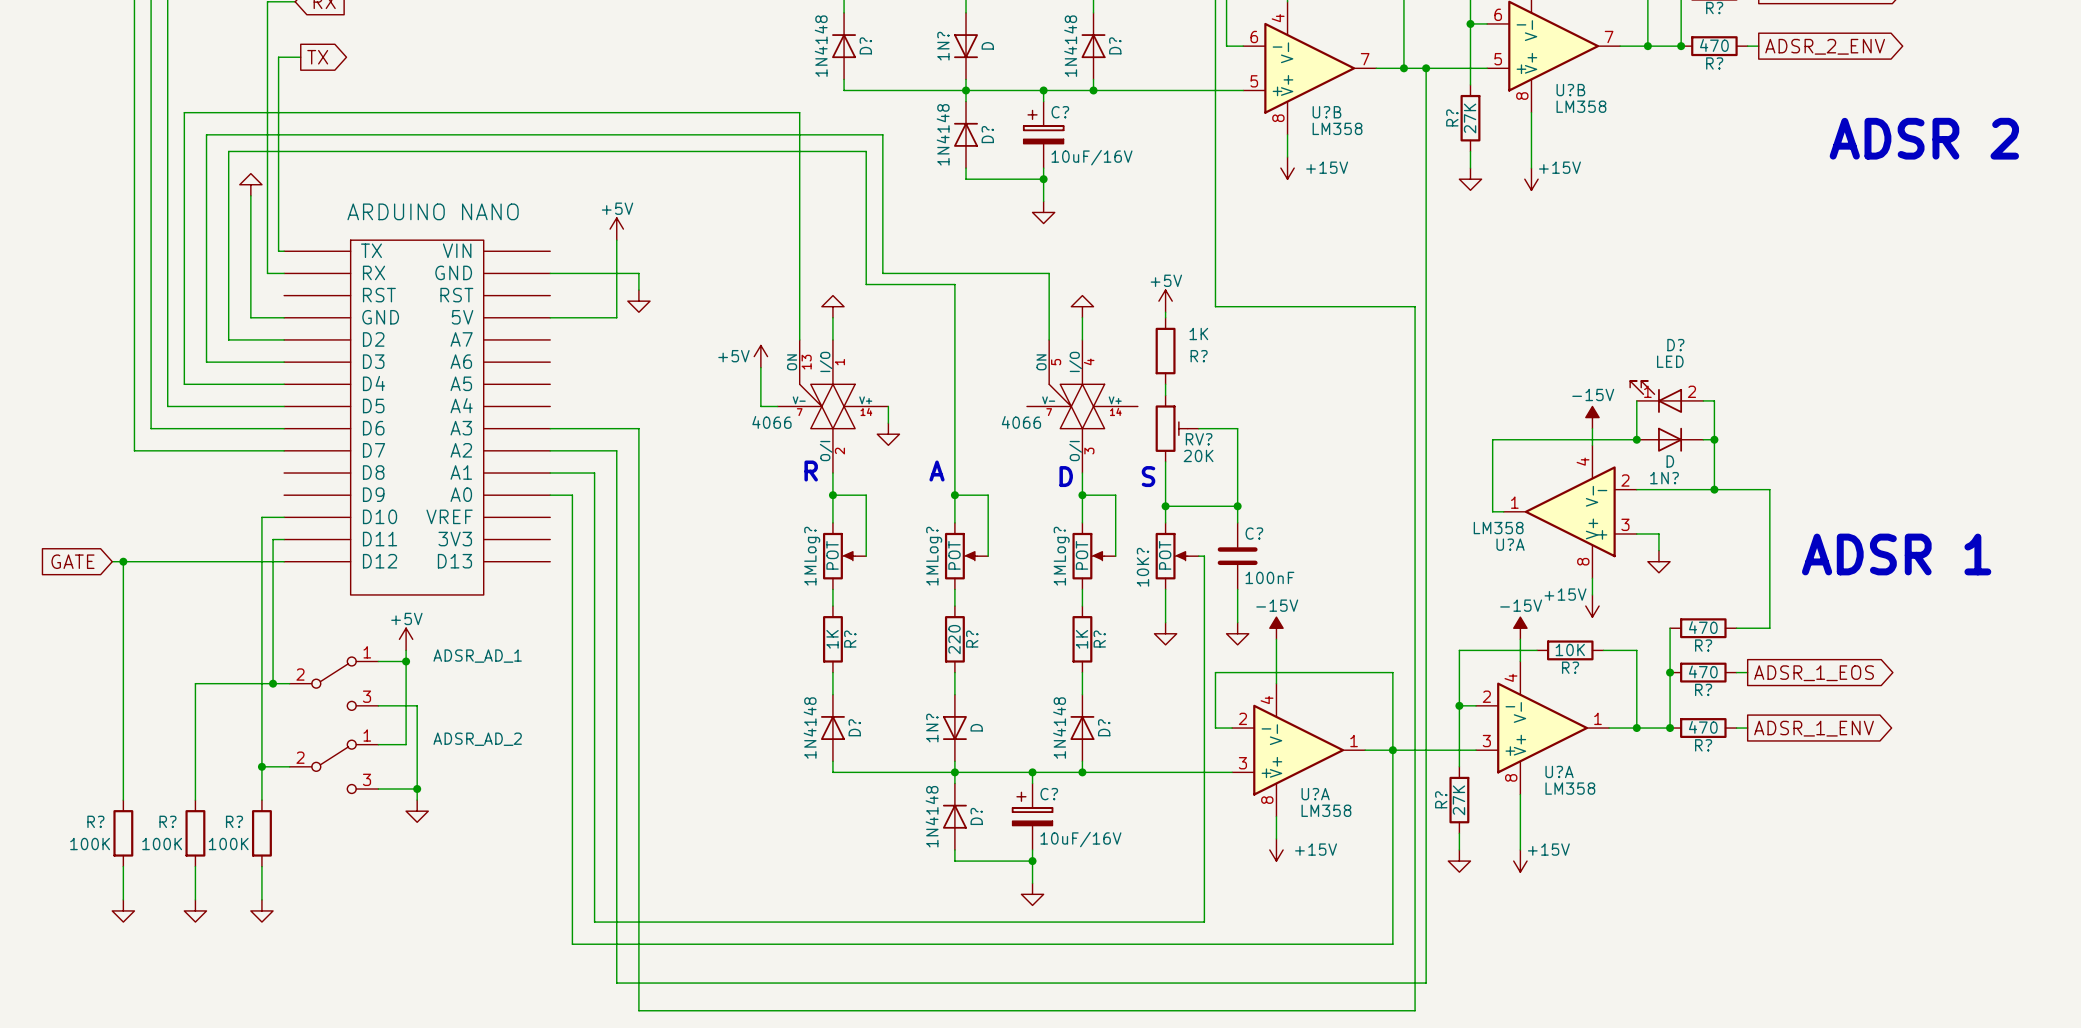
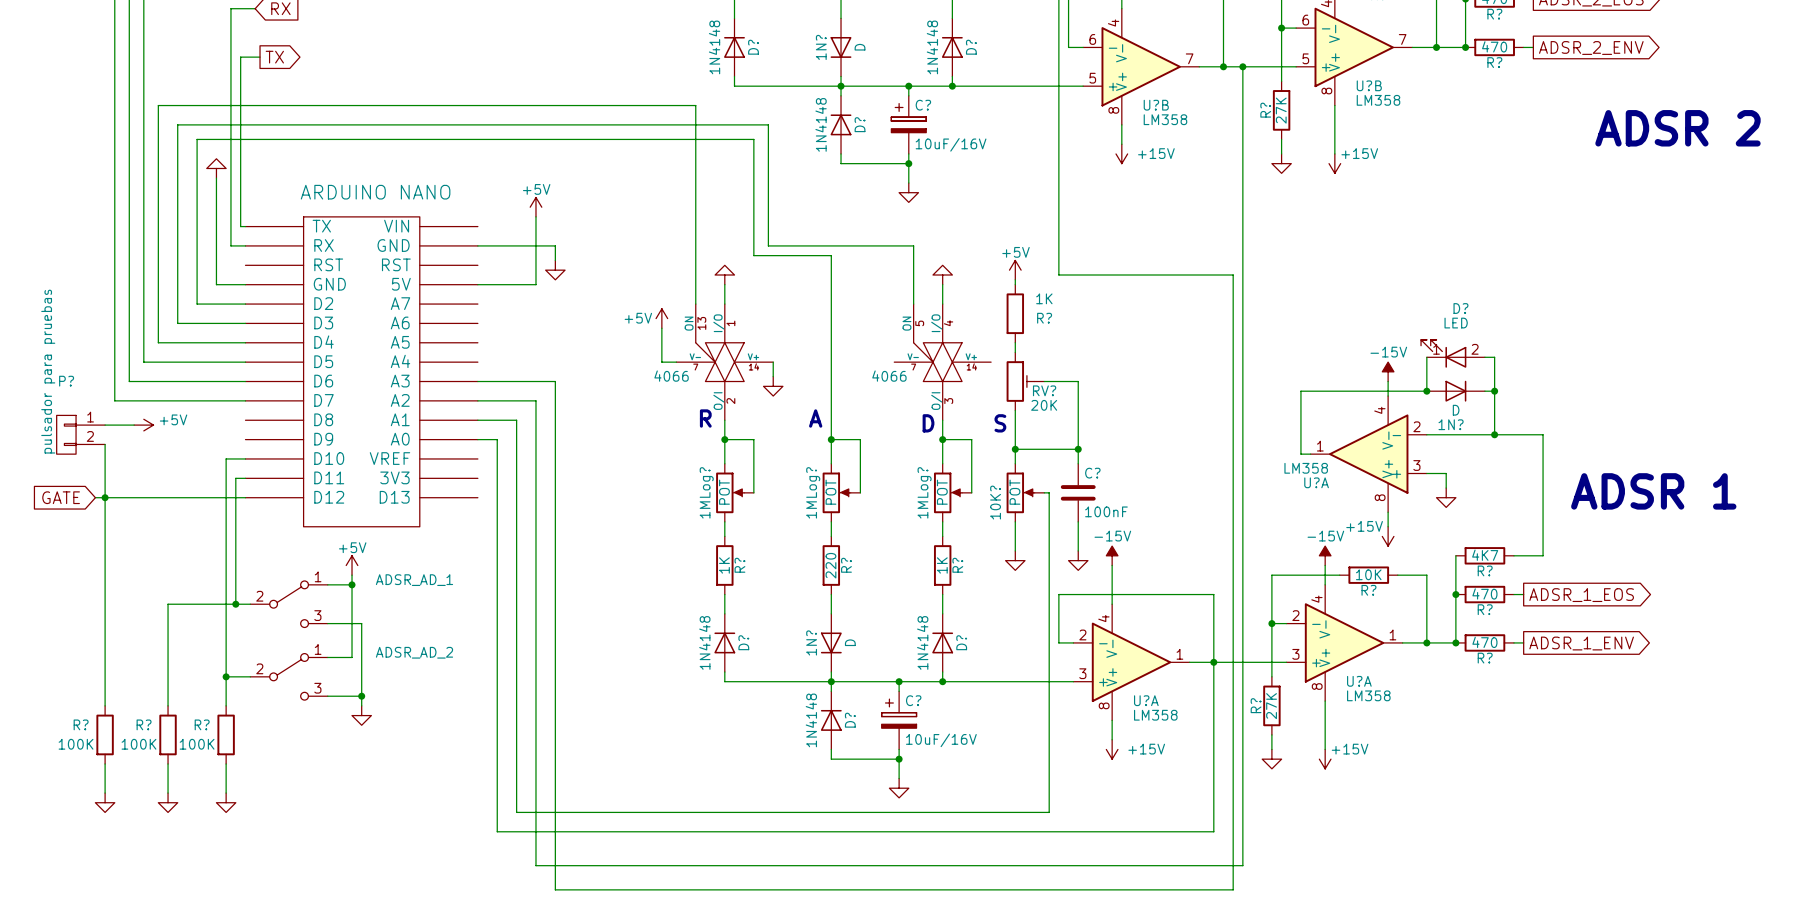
wire: none -> (105, 425) (134, 425)
power symbol: none -> +5V (143, 425)
P?: none -> pulsador para pruebas (80, 434)
wire: none -> (105, 444) (105, 497)
R? value: 470 (1703, 627) -> 4K7 (1485, 555)

